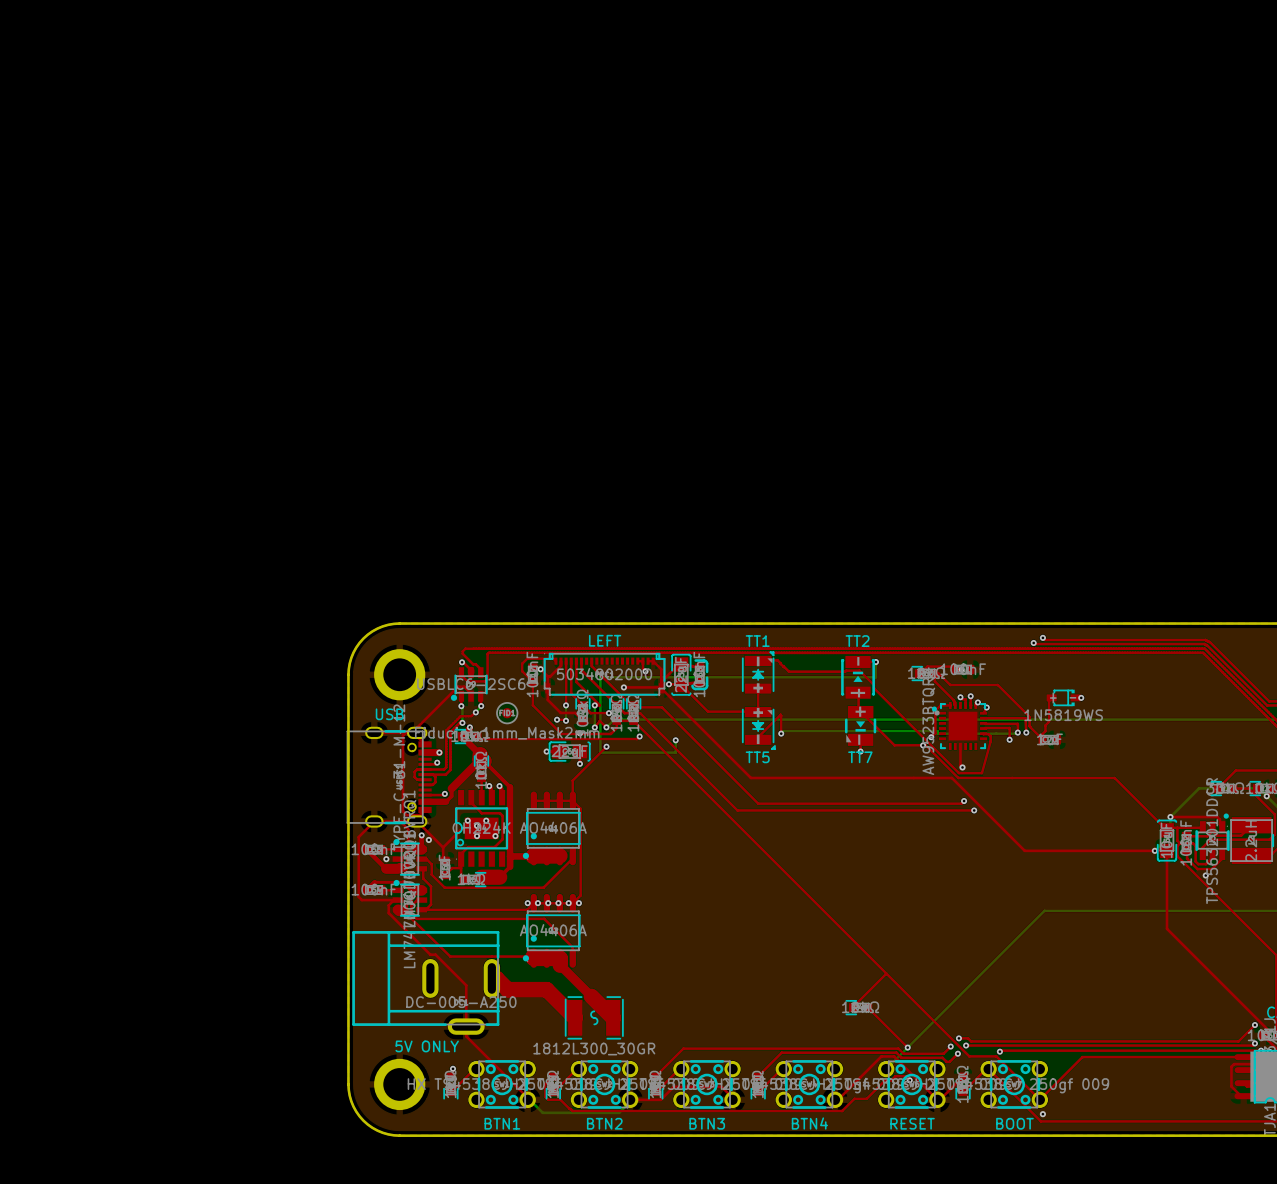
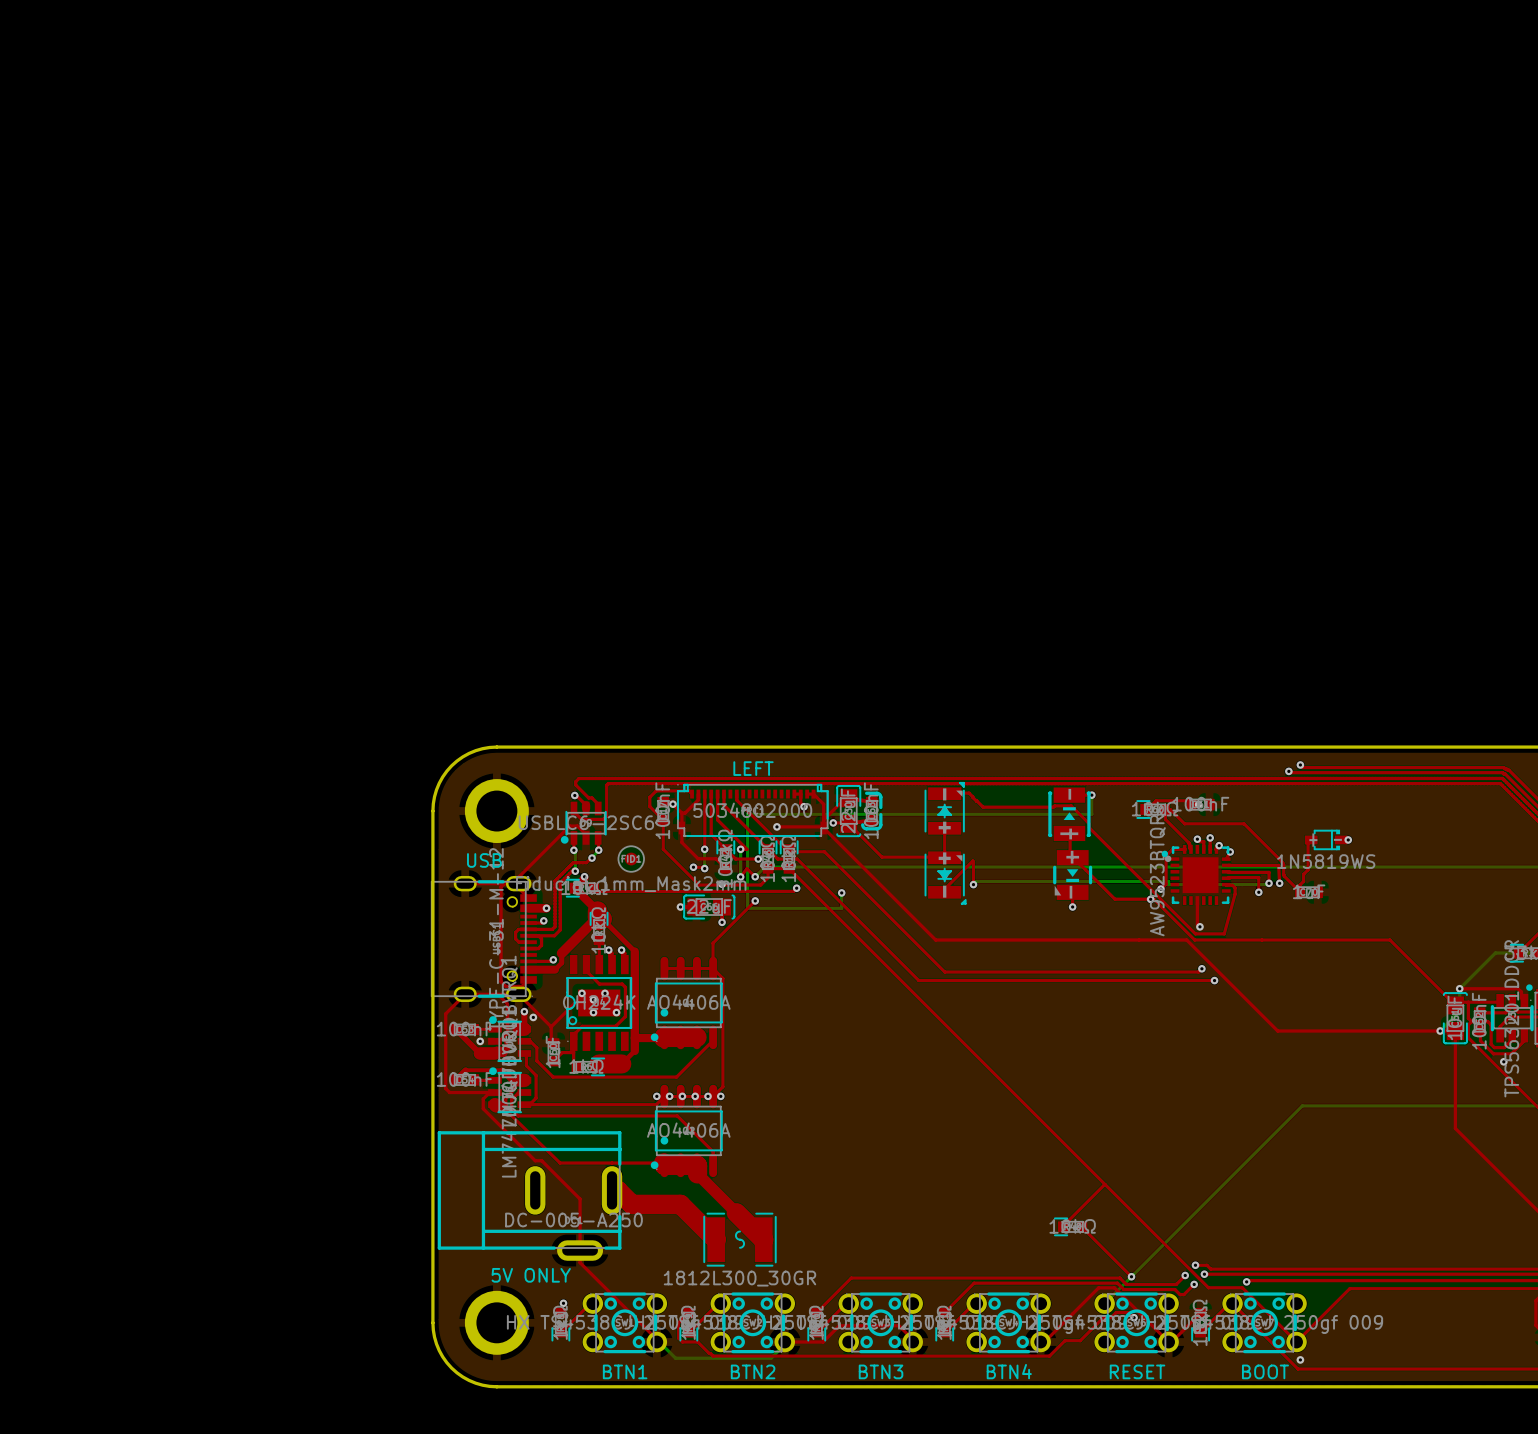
text: TT1 (757, 641) -> none
text: TT2 (857, 641) -> none
text: TT5 (757, 757) -> none
text: TT7 (860, 757) -> none

